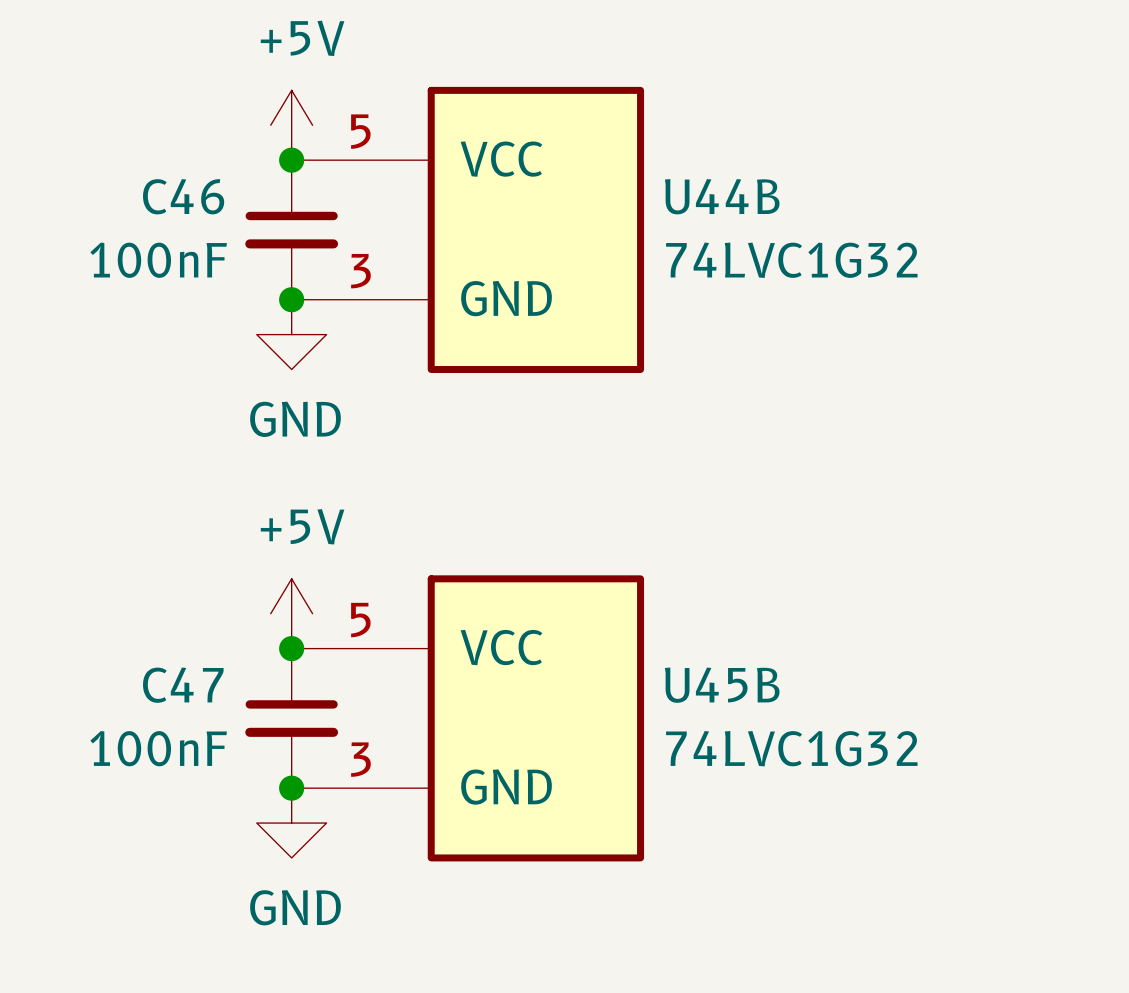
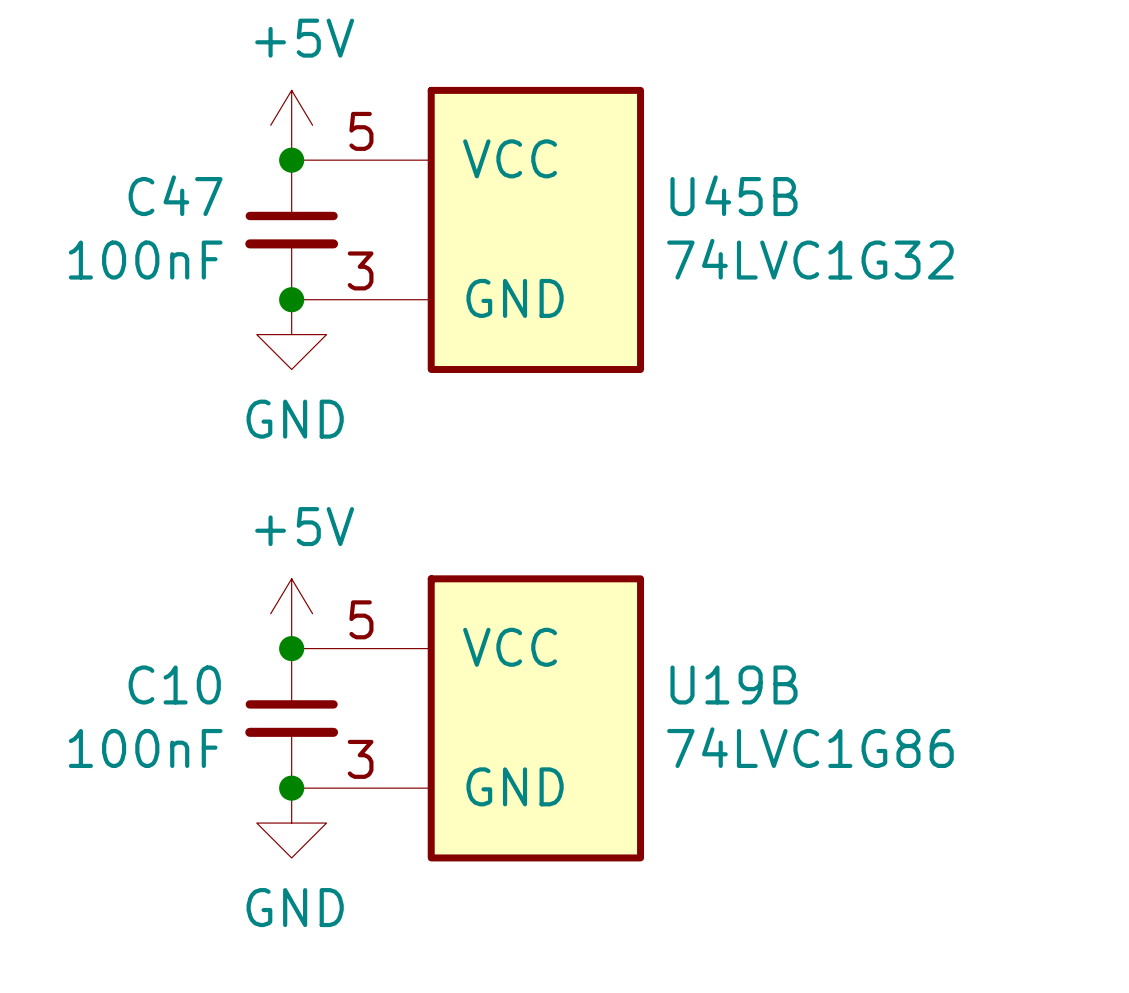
C46 name: C46 (183, 196) -> C47 (175, 195)
U44B name: U44B (722, 196) -> U45B (734, 195)
C47 name: C47 (183, 685) -> C10 (174, 684)
U45B name: U45B (722, 685) -> U19B (734, 684)
U45B value: 74LVC1G32 (791, 748) -> 74LVC1G86 (810, 747)

